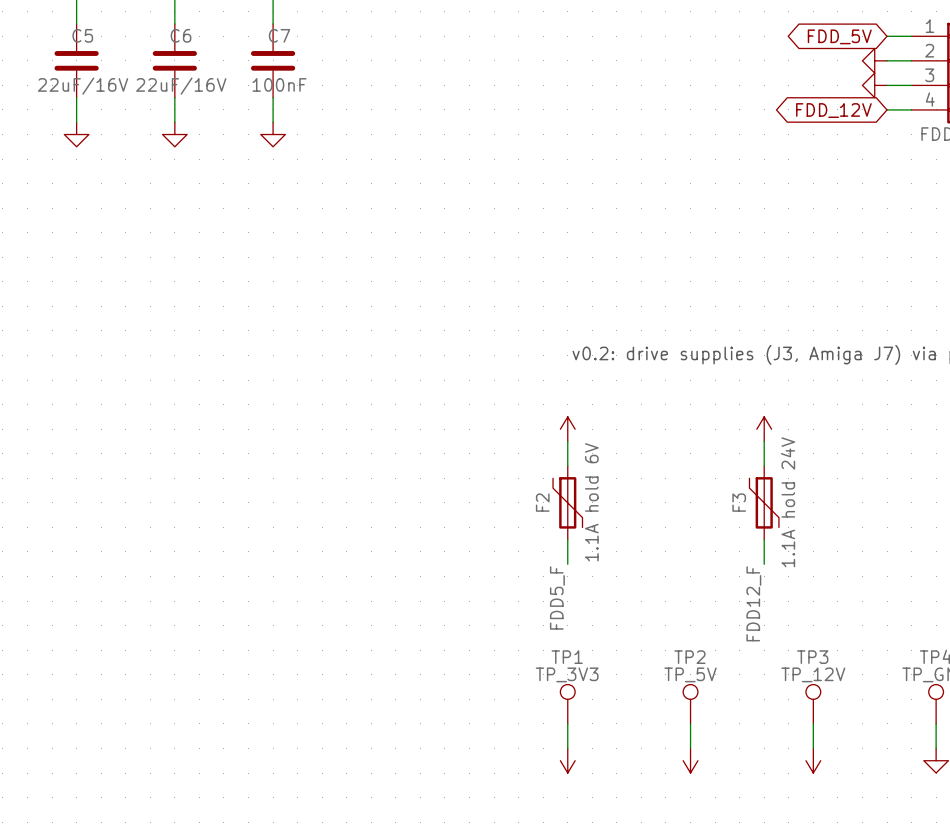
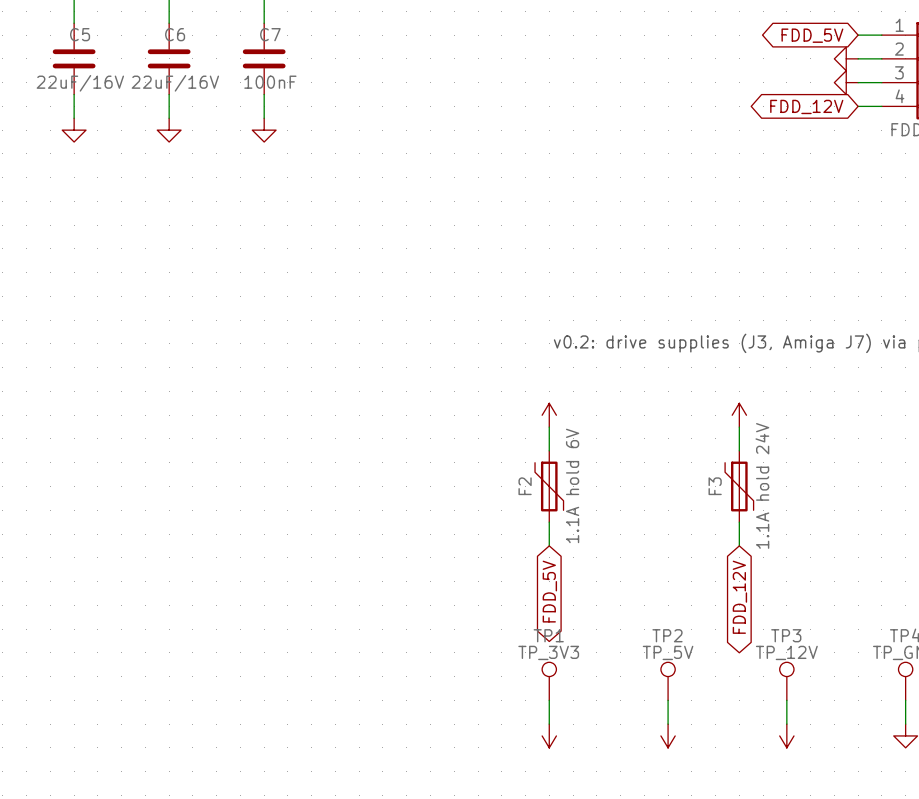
label: FDD5_F (557, 597) -> none
label: FDD12_F (753, 603) -> none
global label: none -> FDD_5V (549, 591)
global label: none -> FDD_12V (739, 597)

